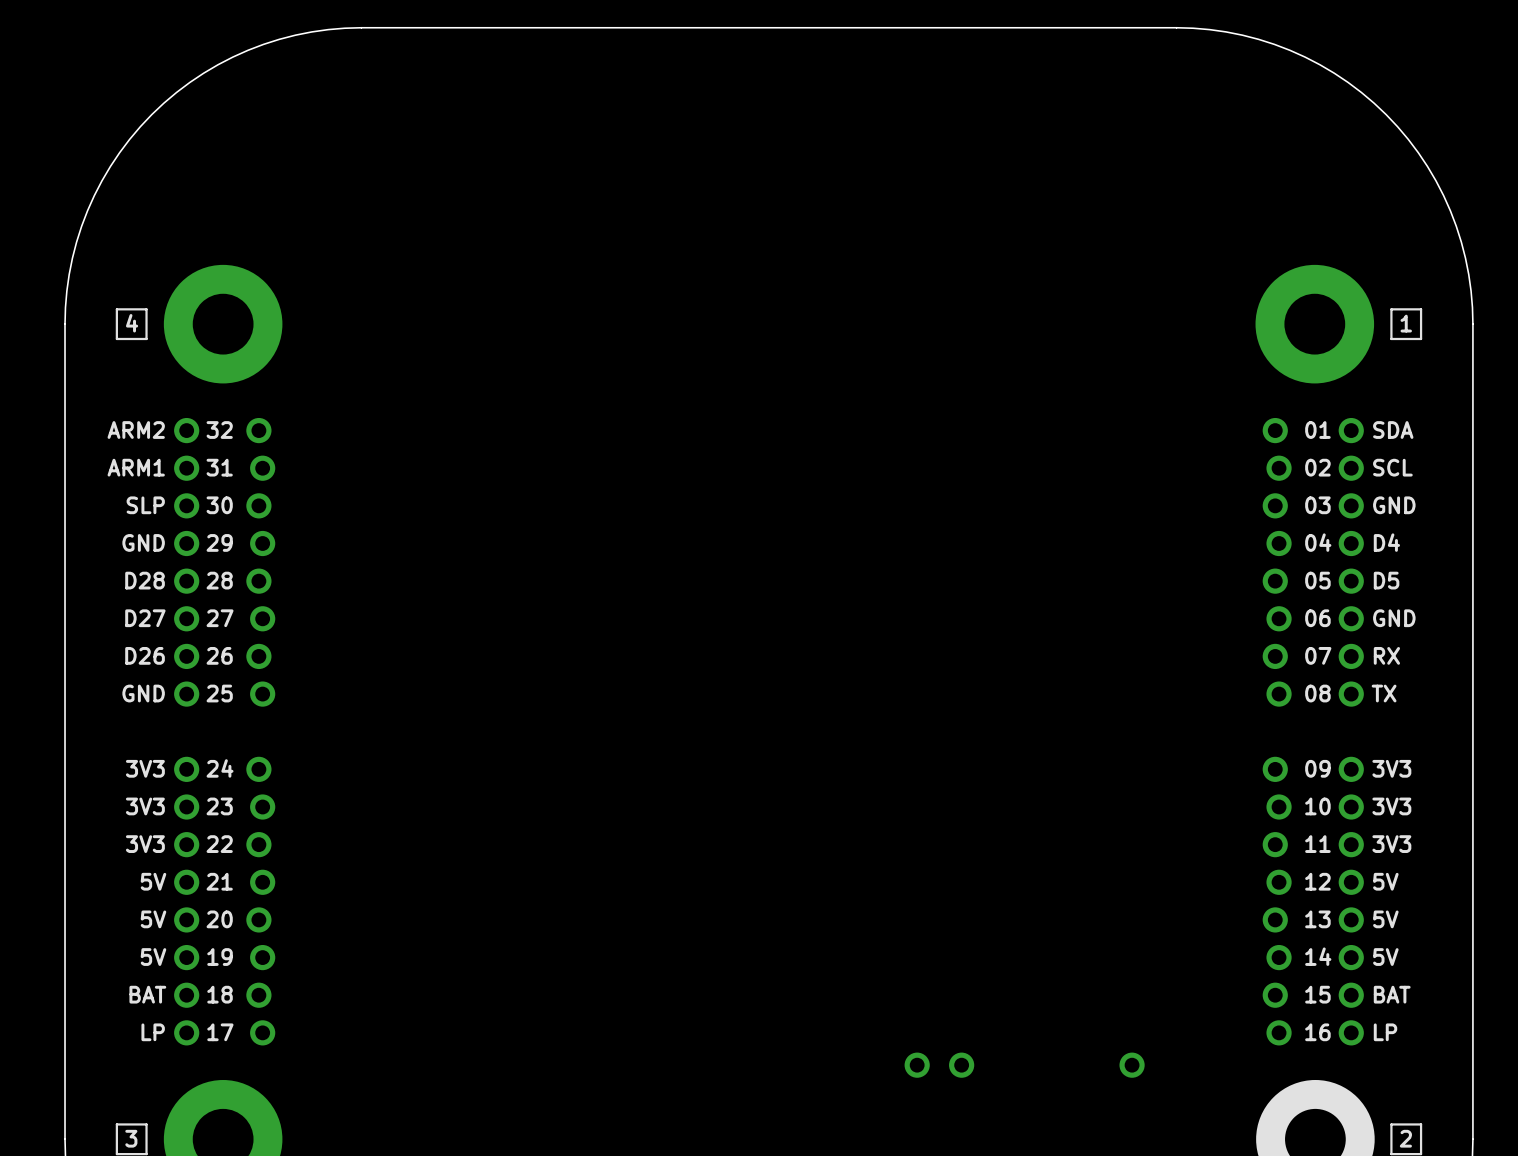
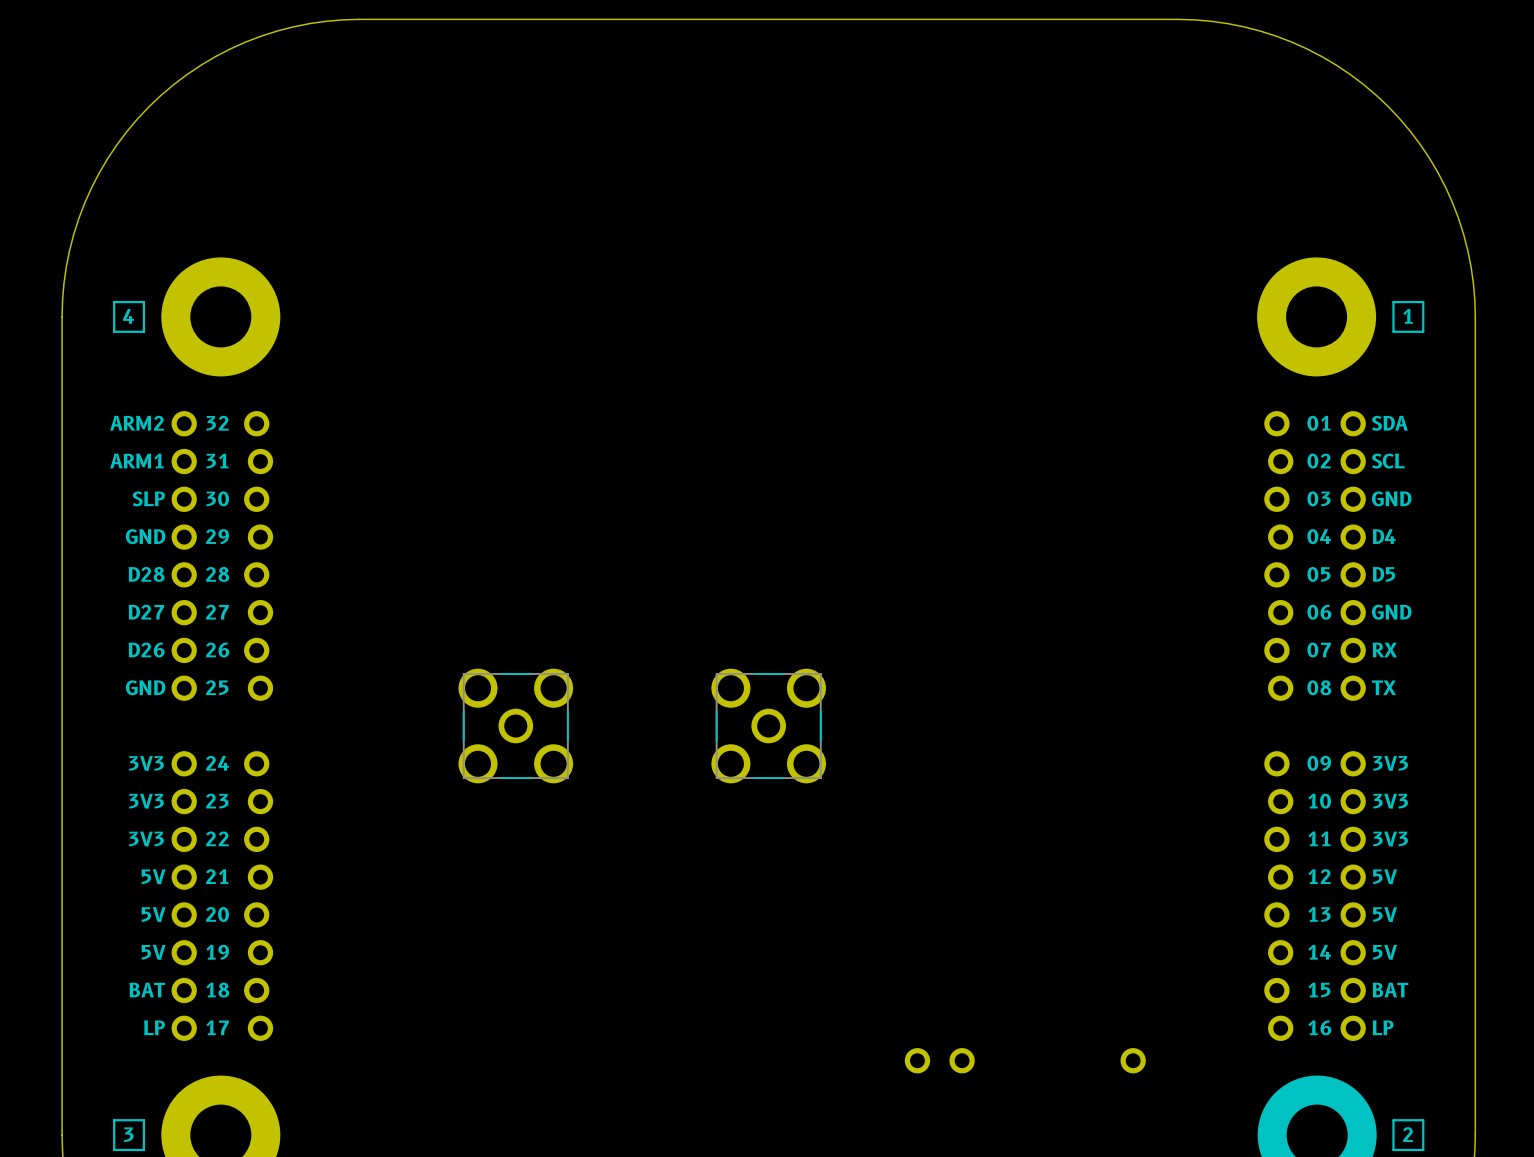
part: none -> (515, 726)
part: none -> (768, 726)

